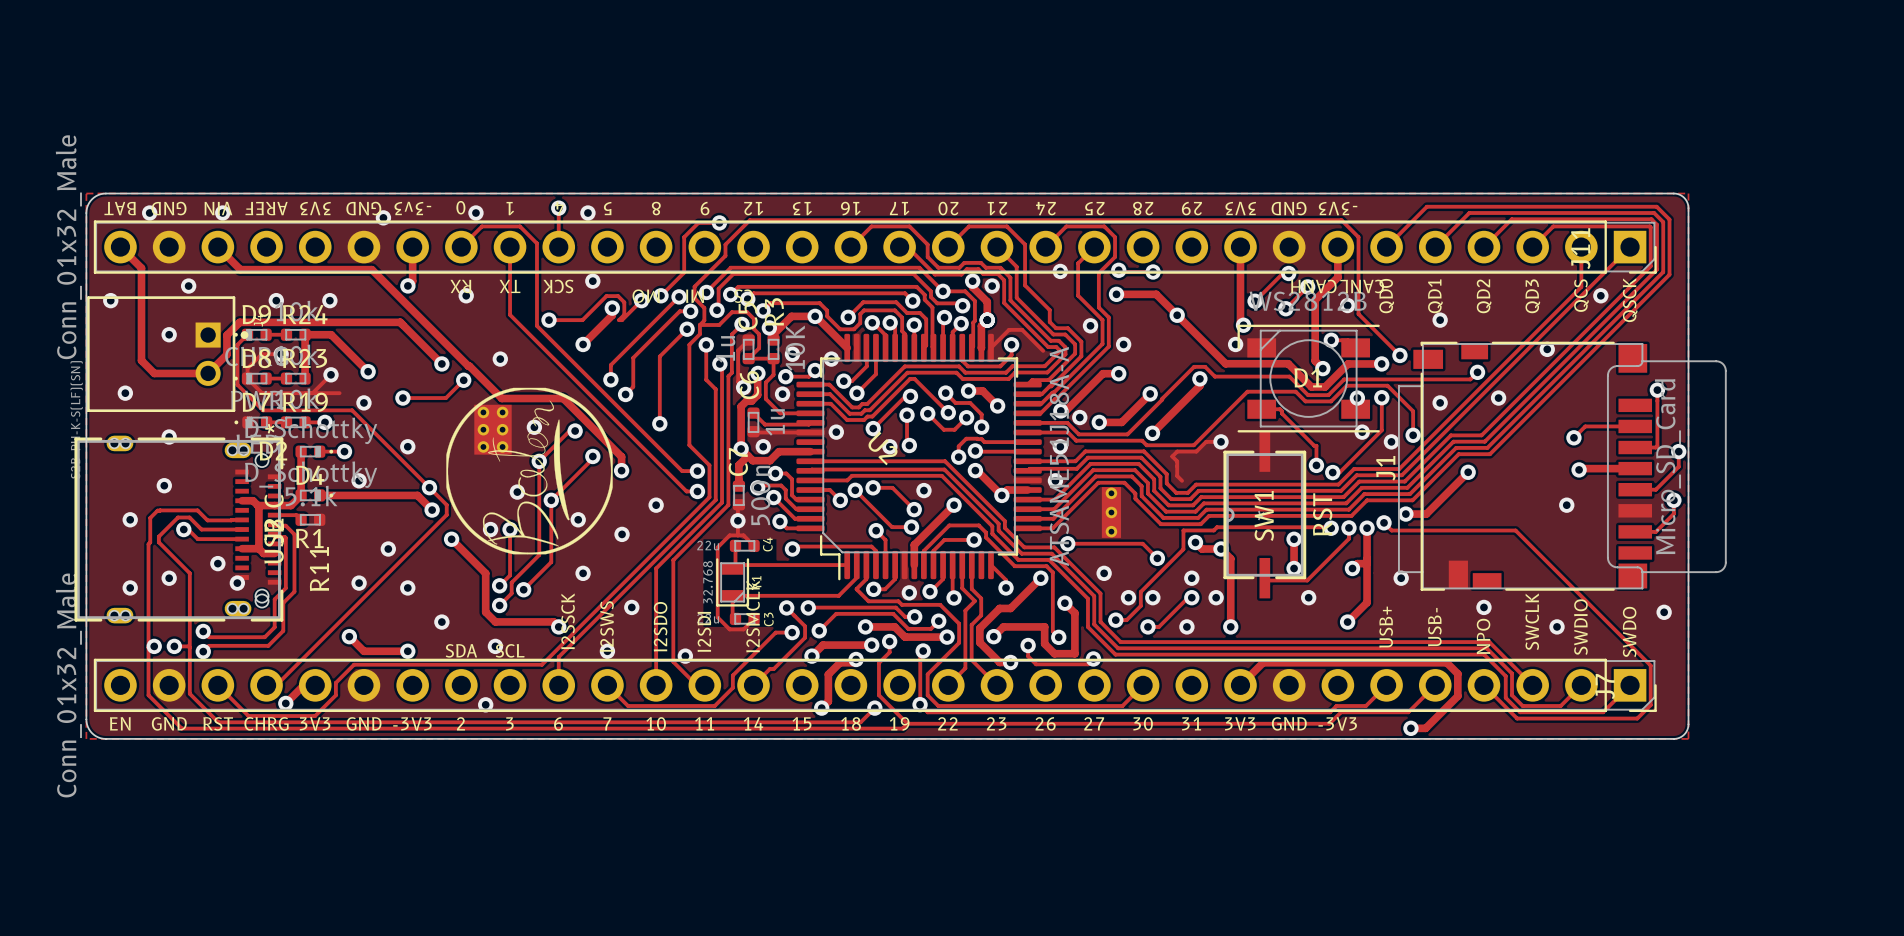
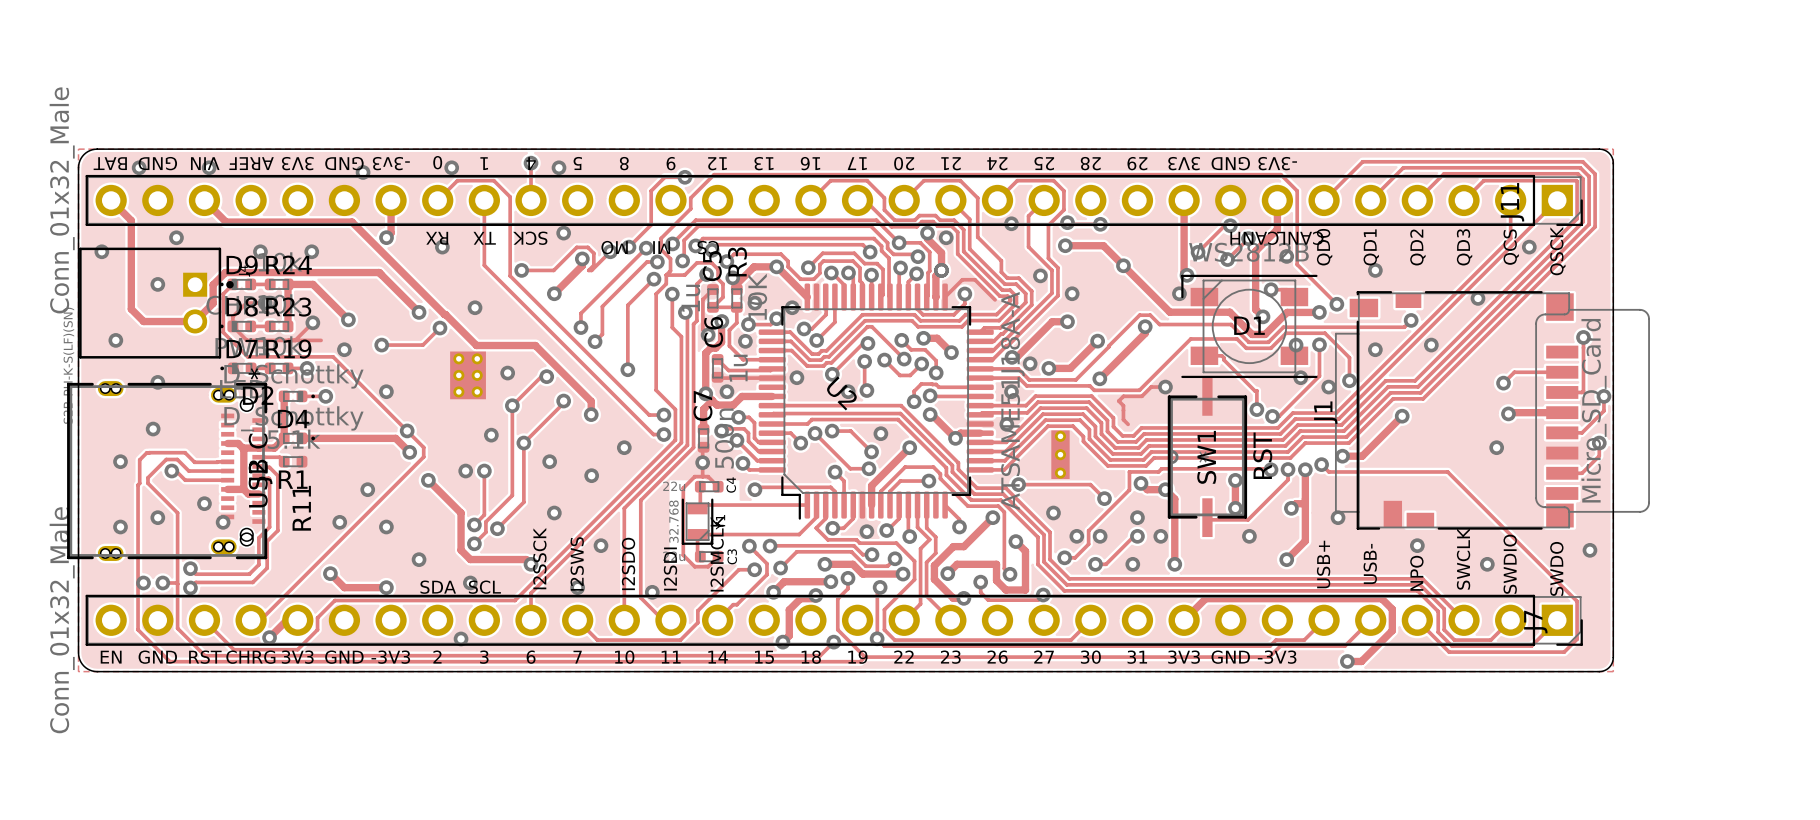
drawing: [446, 387, 613, 555] -> none
via: (359, 480) -> none

